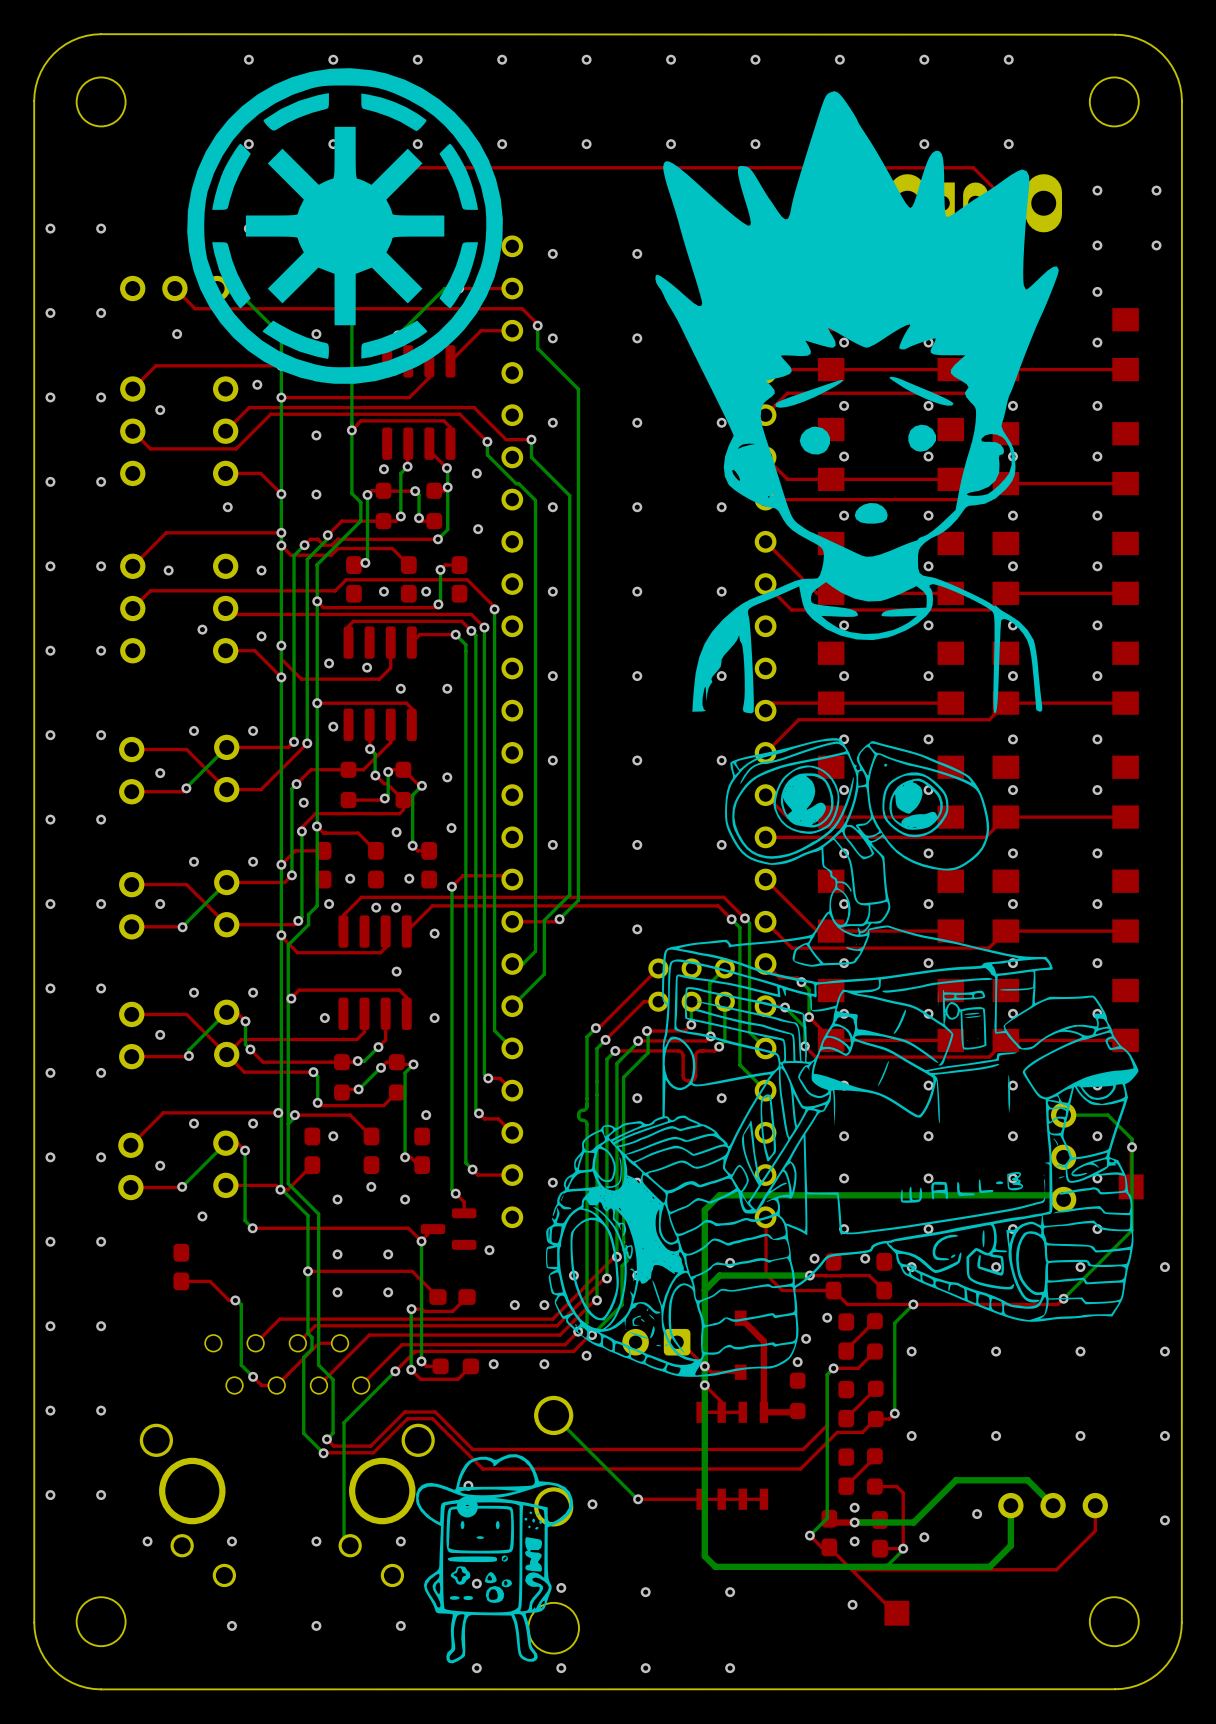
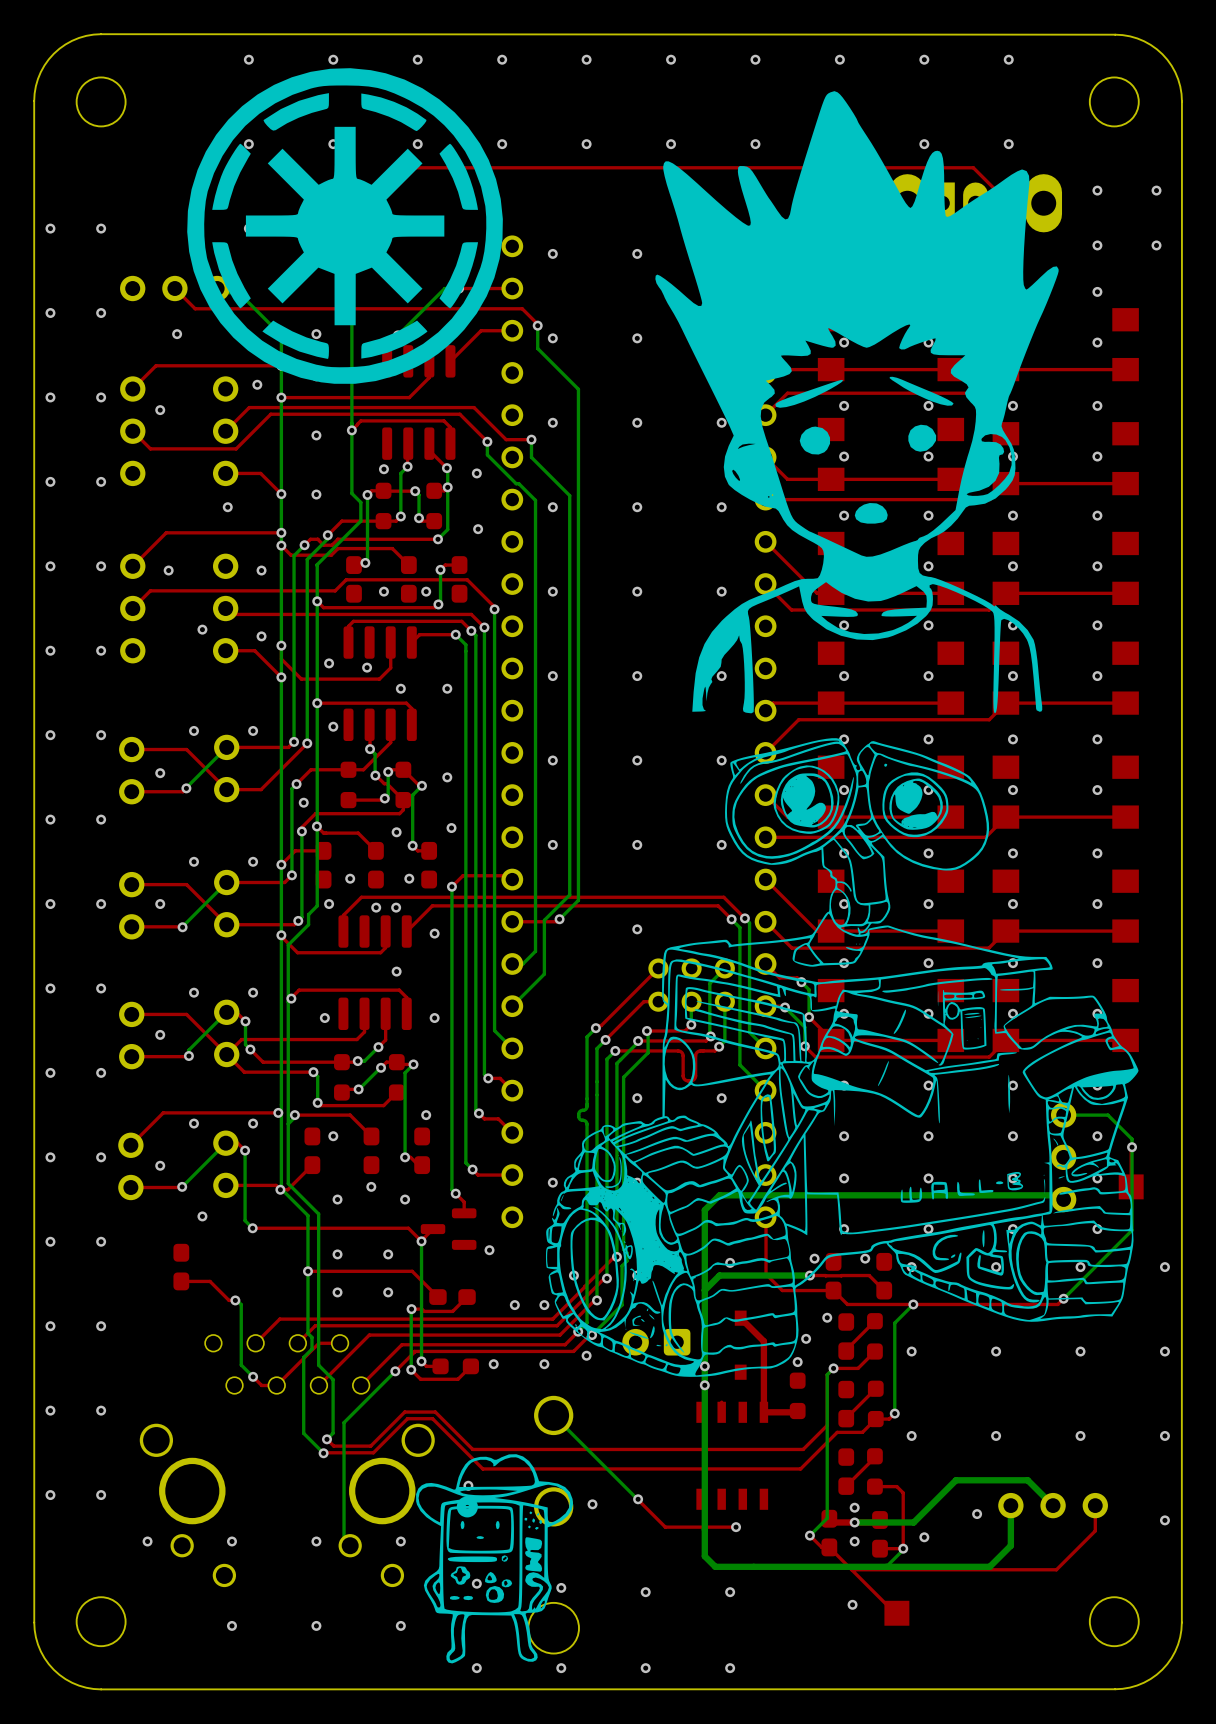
top track: (680, 1342) (710, 1372) (740, 1372) -> none
top track: (704, 1385) (721, 1402) -> none
top track: (742, 1412) (700, 1412) -> none
top track: (763, 1499) (638, 1499) -> (736, 1527) (665, 1527) (637, 1499)
via: none -> (736, 1527)

